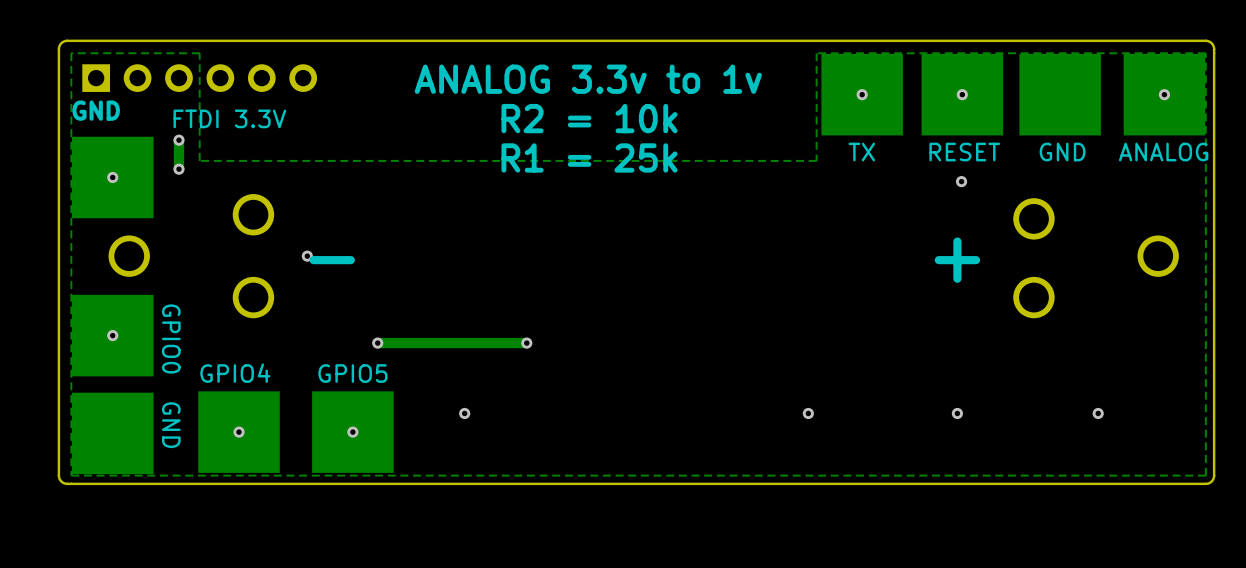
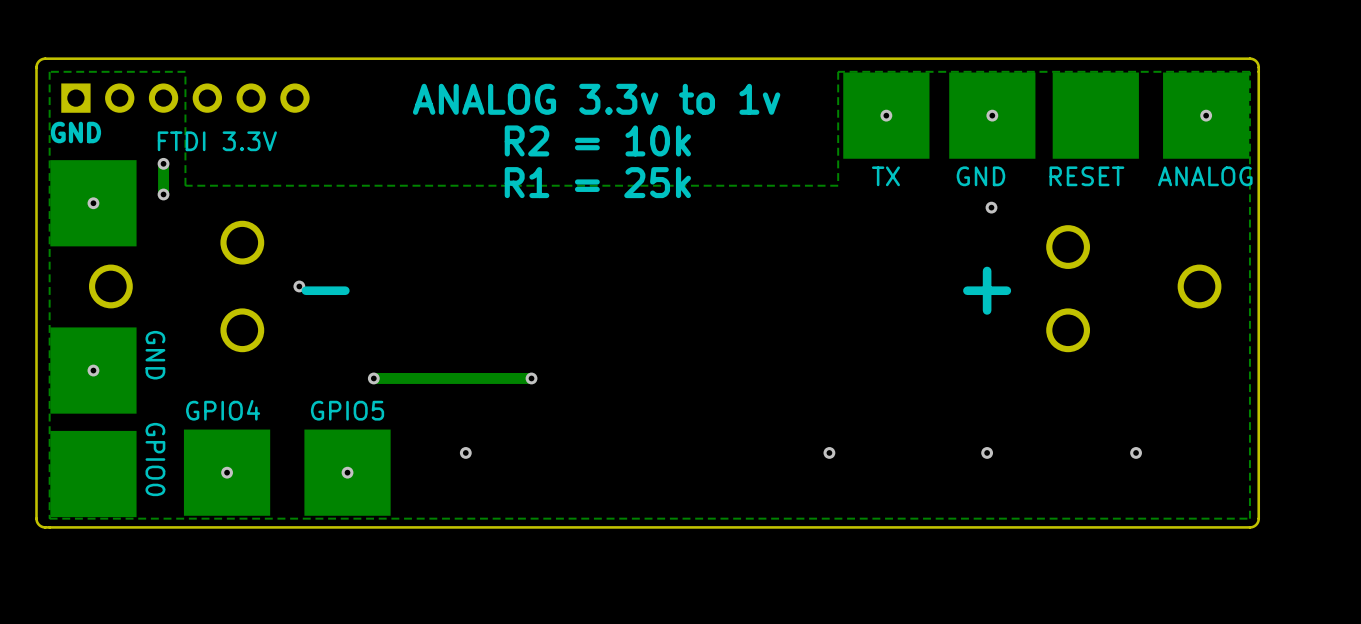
RESET GND name: RESET GND (1007, 152) -> GND RESET (1040, 176)
GPIO0 GND name: GPIO0 GND (171, 376) -> GND GPIO0 (155, 413)

